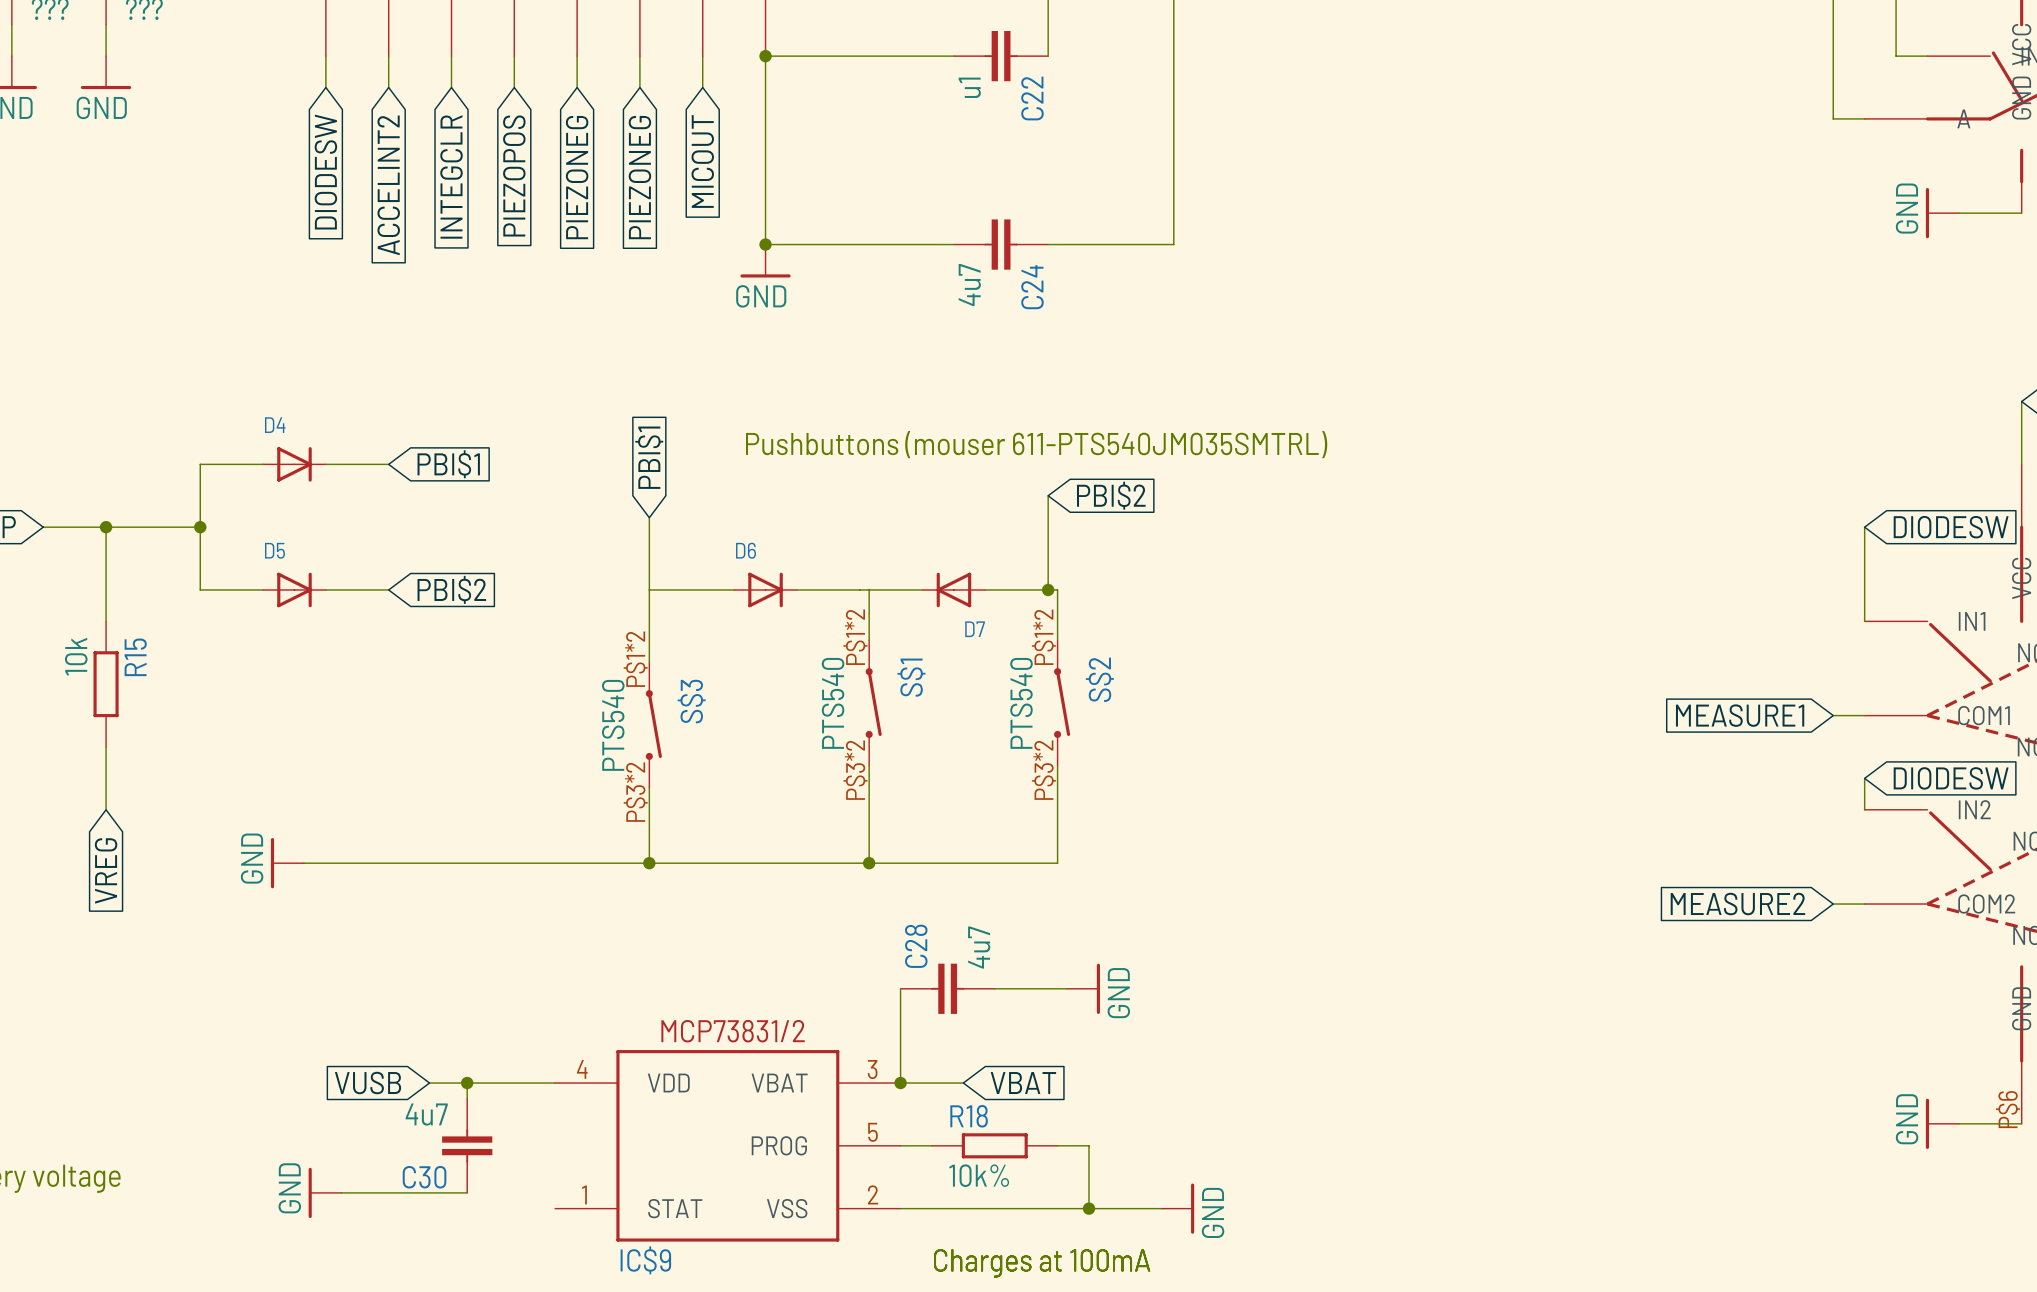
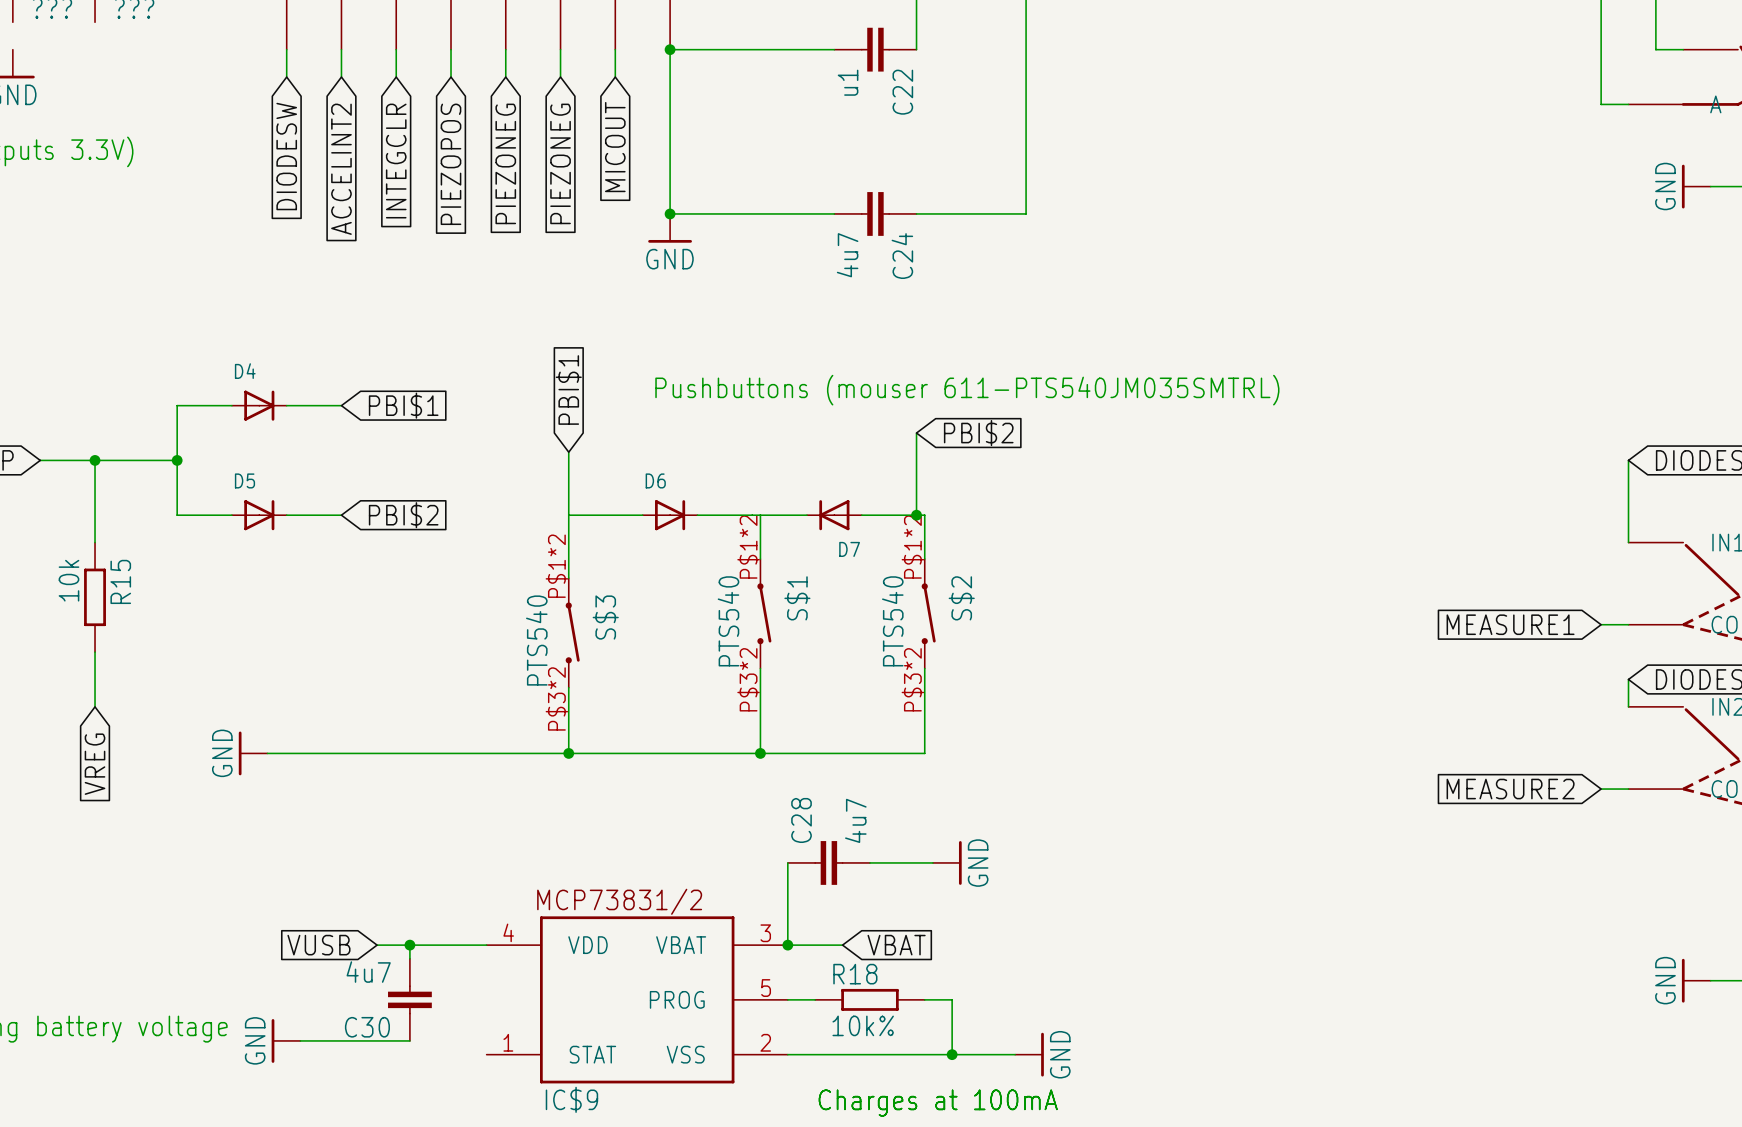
wire: (11, 24) (11, 56) -> none
wire: (106, 24) (106, 56) -> none
power symbol: GND (106, 72) -> none

